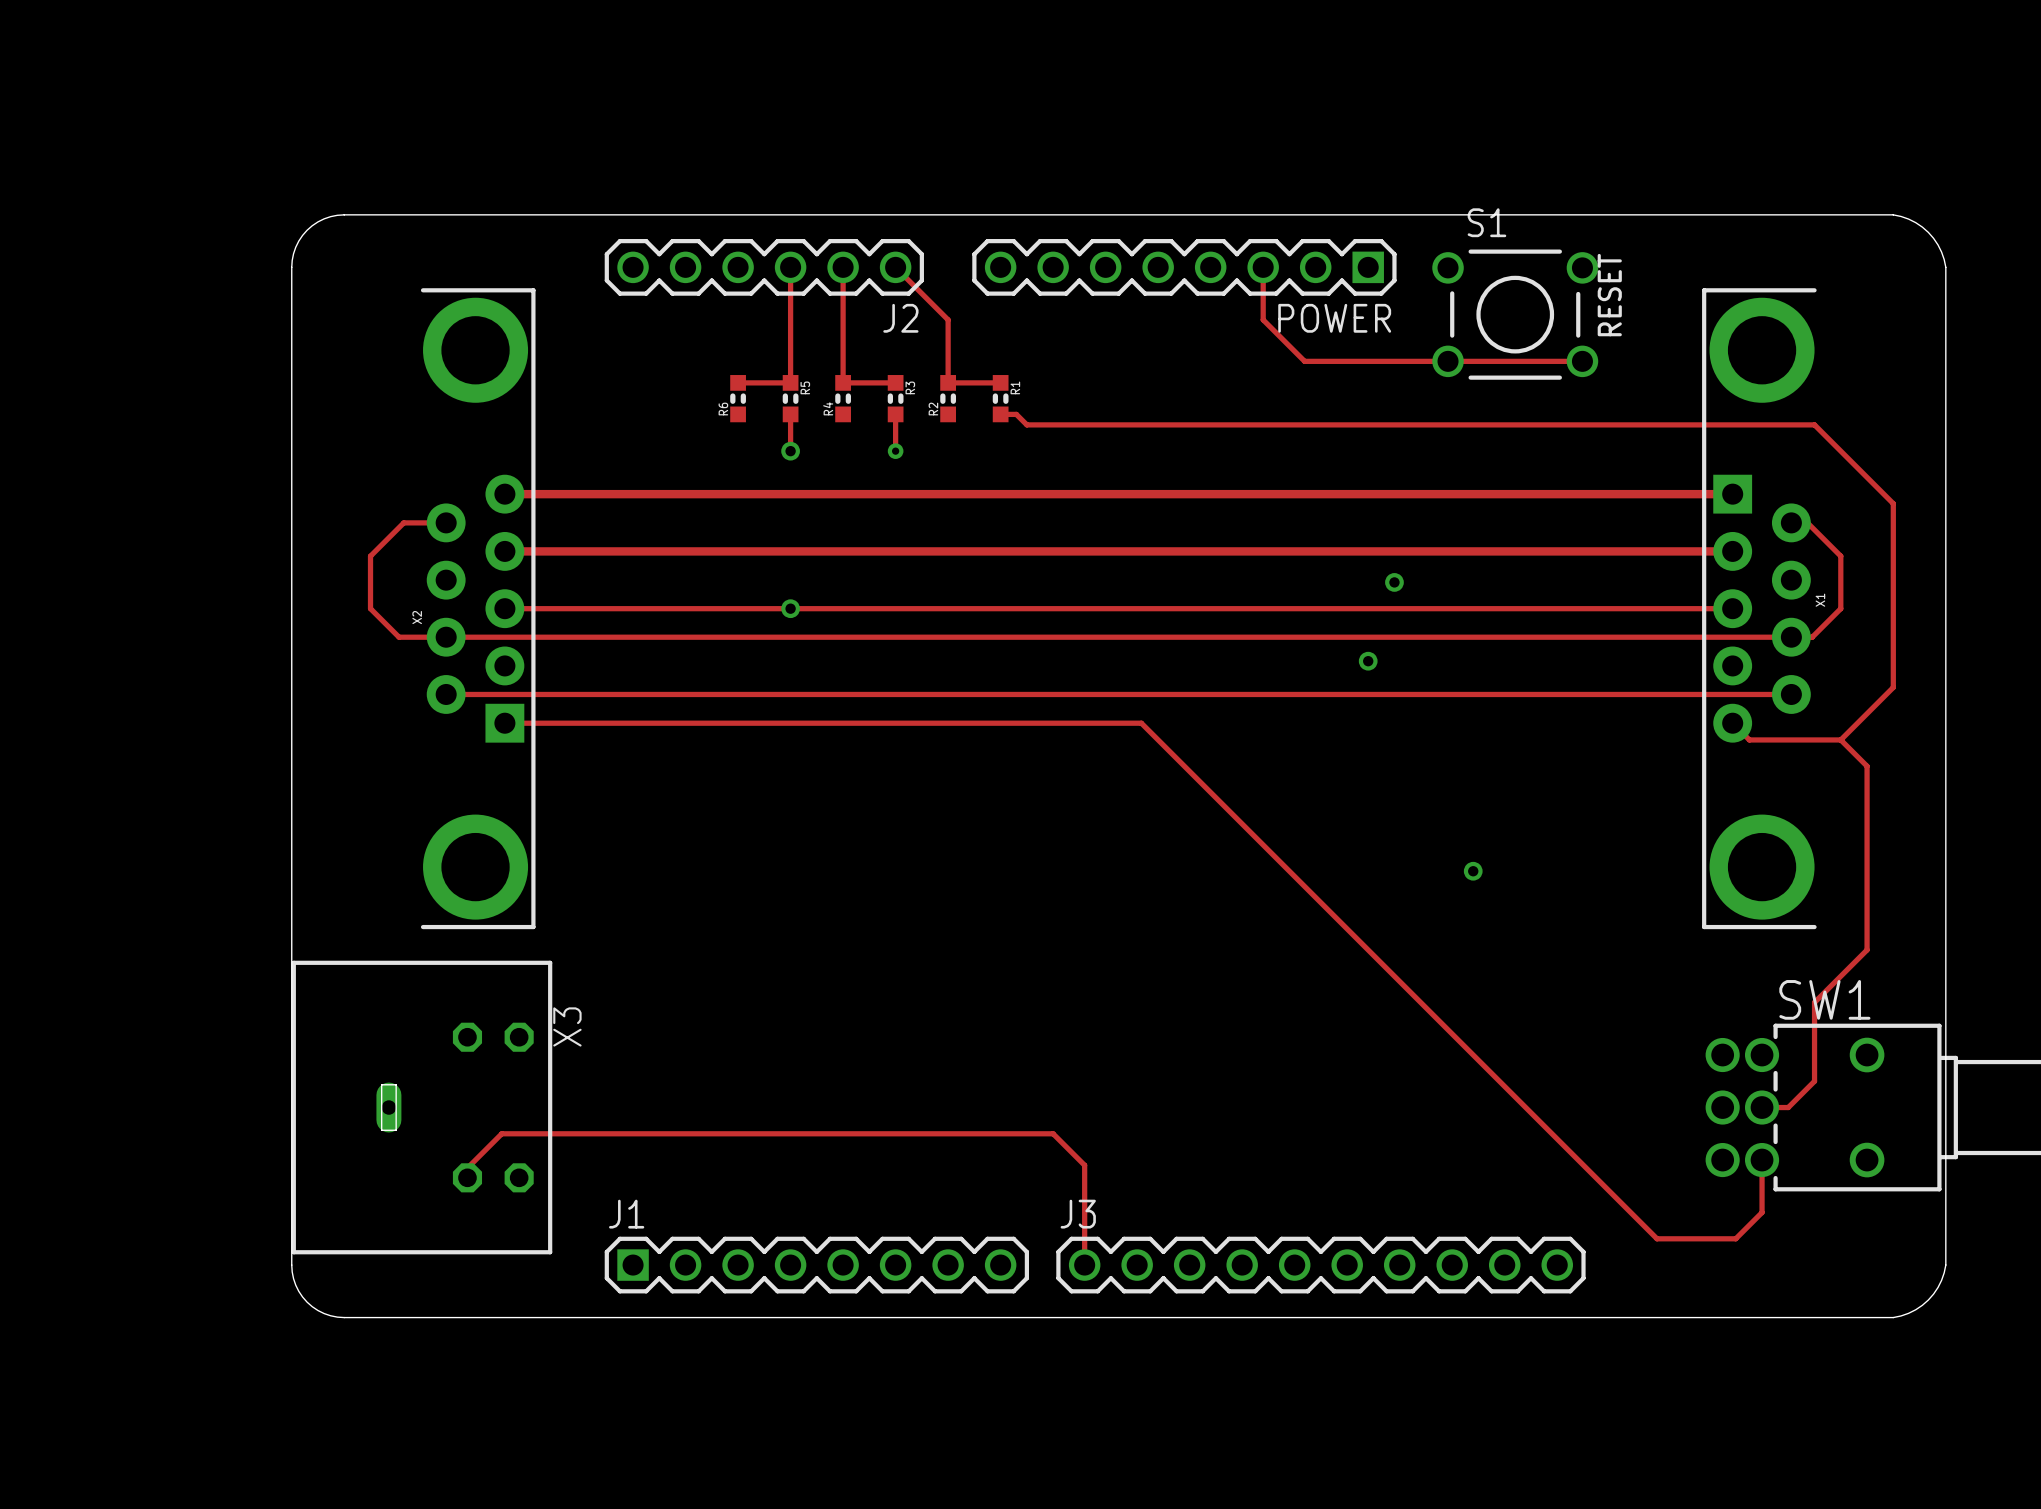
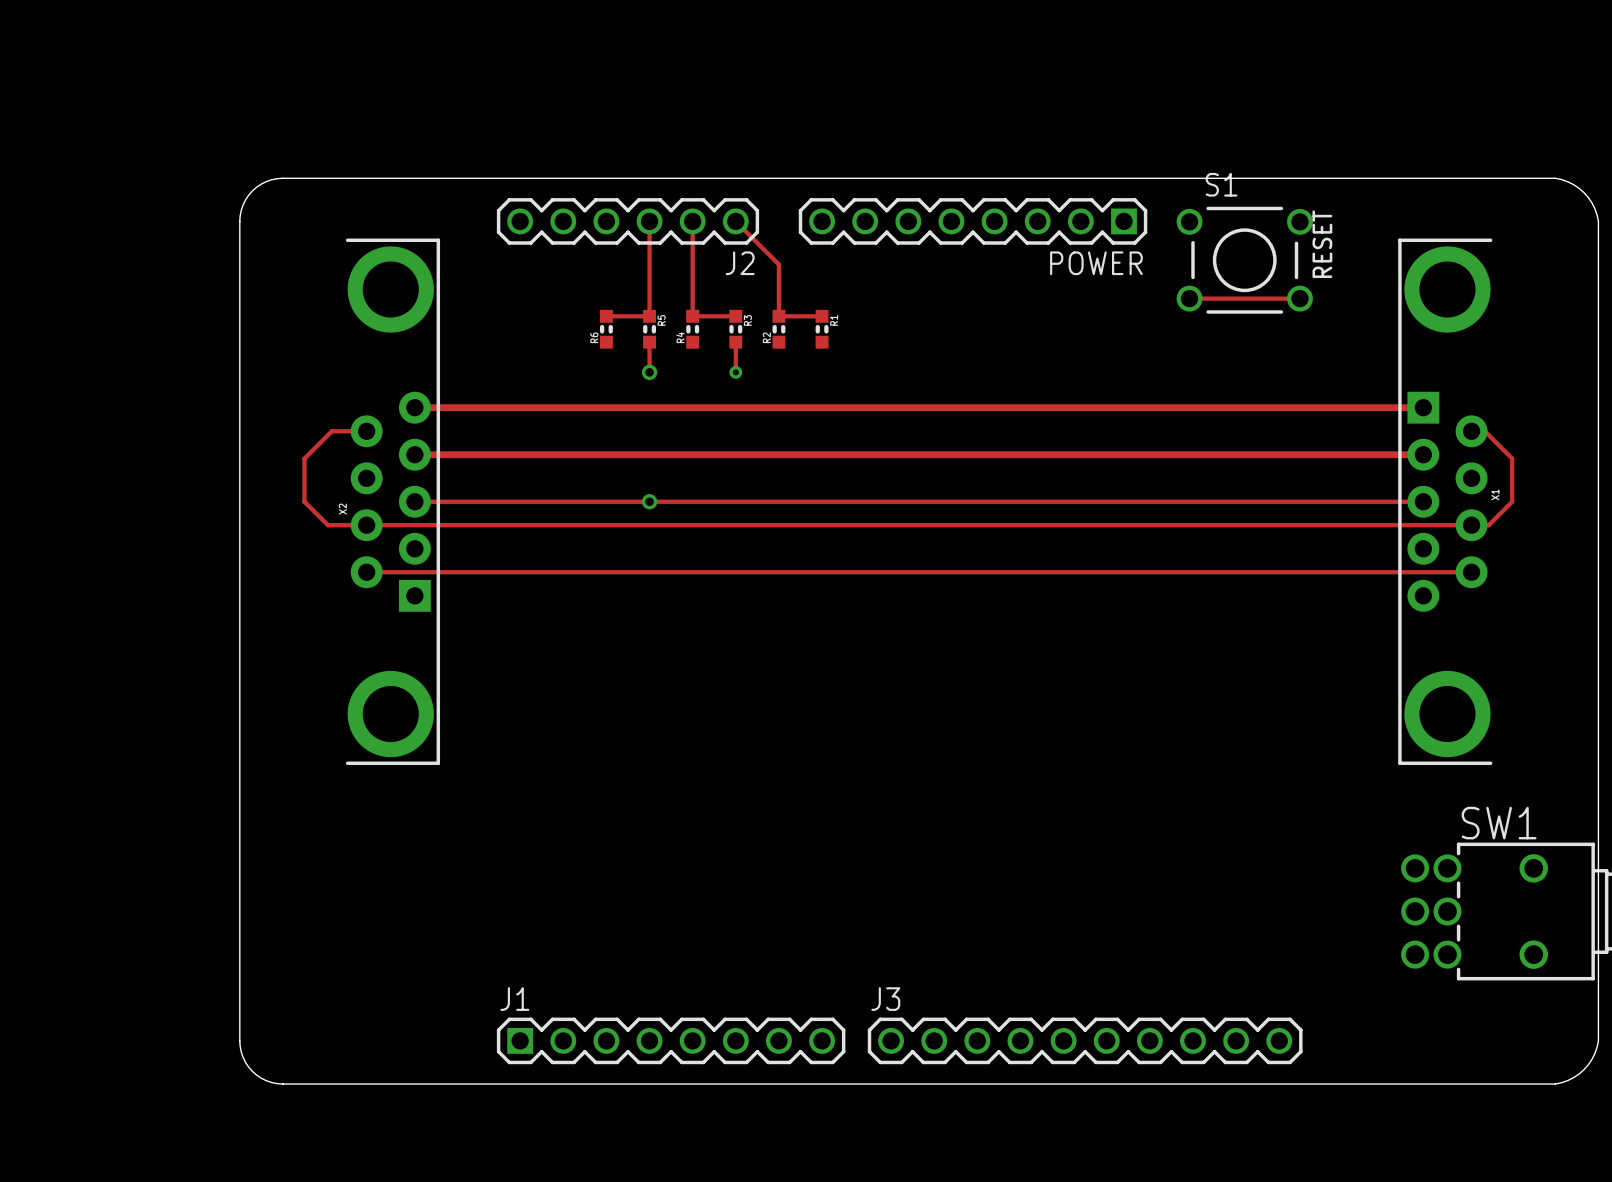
track: (1263, 267) (1263, 319) (1304, 361) (1448, 361) -> none
track: (1000, 414) (1016, 414) (1026, 424) (1814, 424) (1893, 503) (1893, 687) (1840, 739) -> none
via: (1394, 582) -> none
via: (1368, 661) -> none
track: (504, 723) (1141, 723) (1657, 1238) (1735, 1238) (1762, 1212) (1762, 1160) -> none
track: (1732, 723) (1749, 739) (1840, 739) -> none
track: (1840, 739) (1867, 766) (1867, 950) (1814, 1002) (1814, 1081) (1788, 1107) (1762, 1107) -> none
via: (1473, 871) -> none
X3: (421, 1107) -> none
track: (467, 1177) (467, 1168) (501, 1133) (1053, 1133) (1084, 1165) (1084, 1265) -> none

